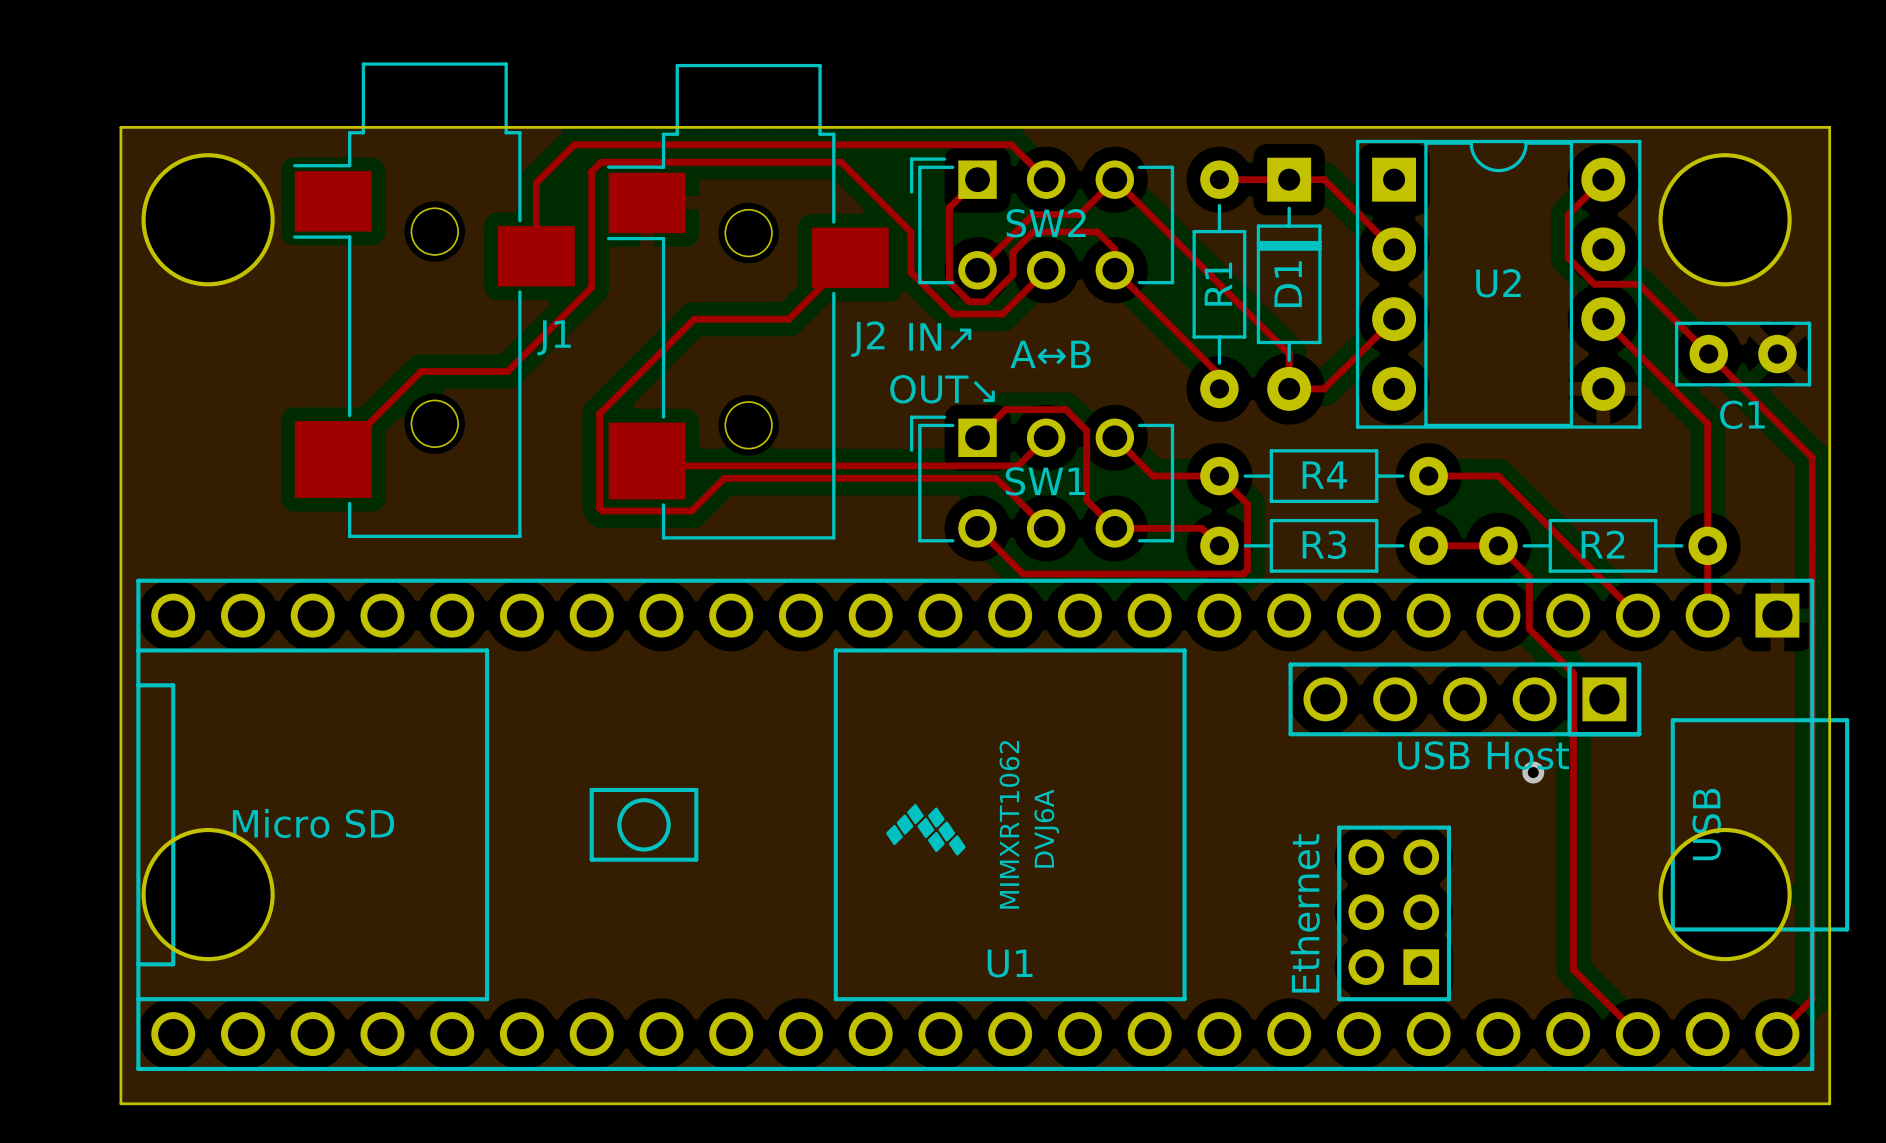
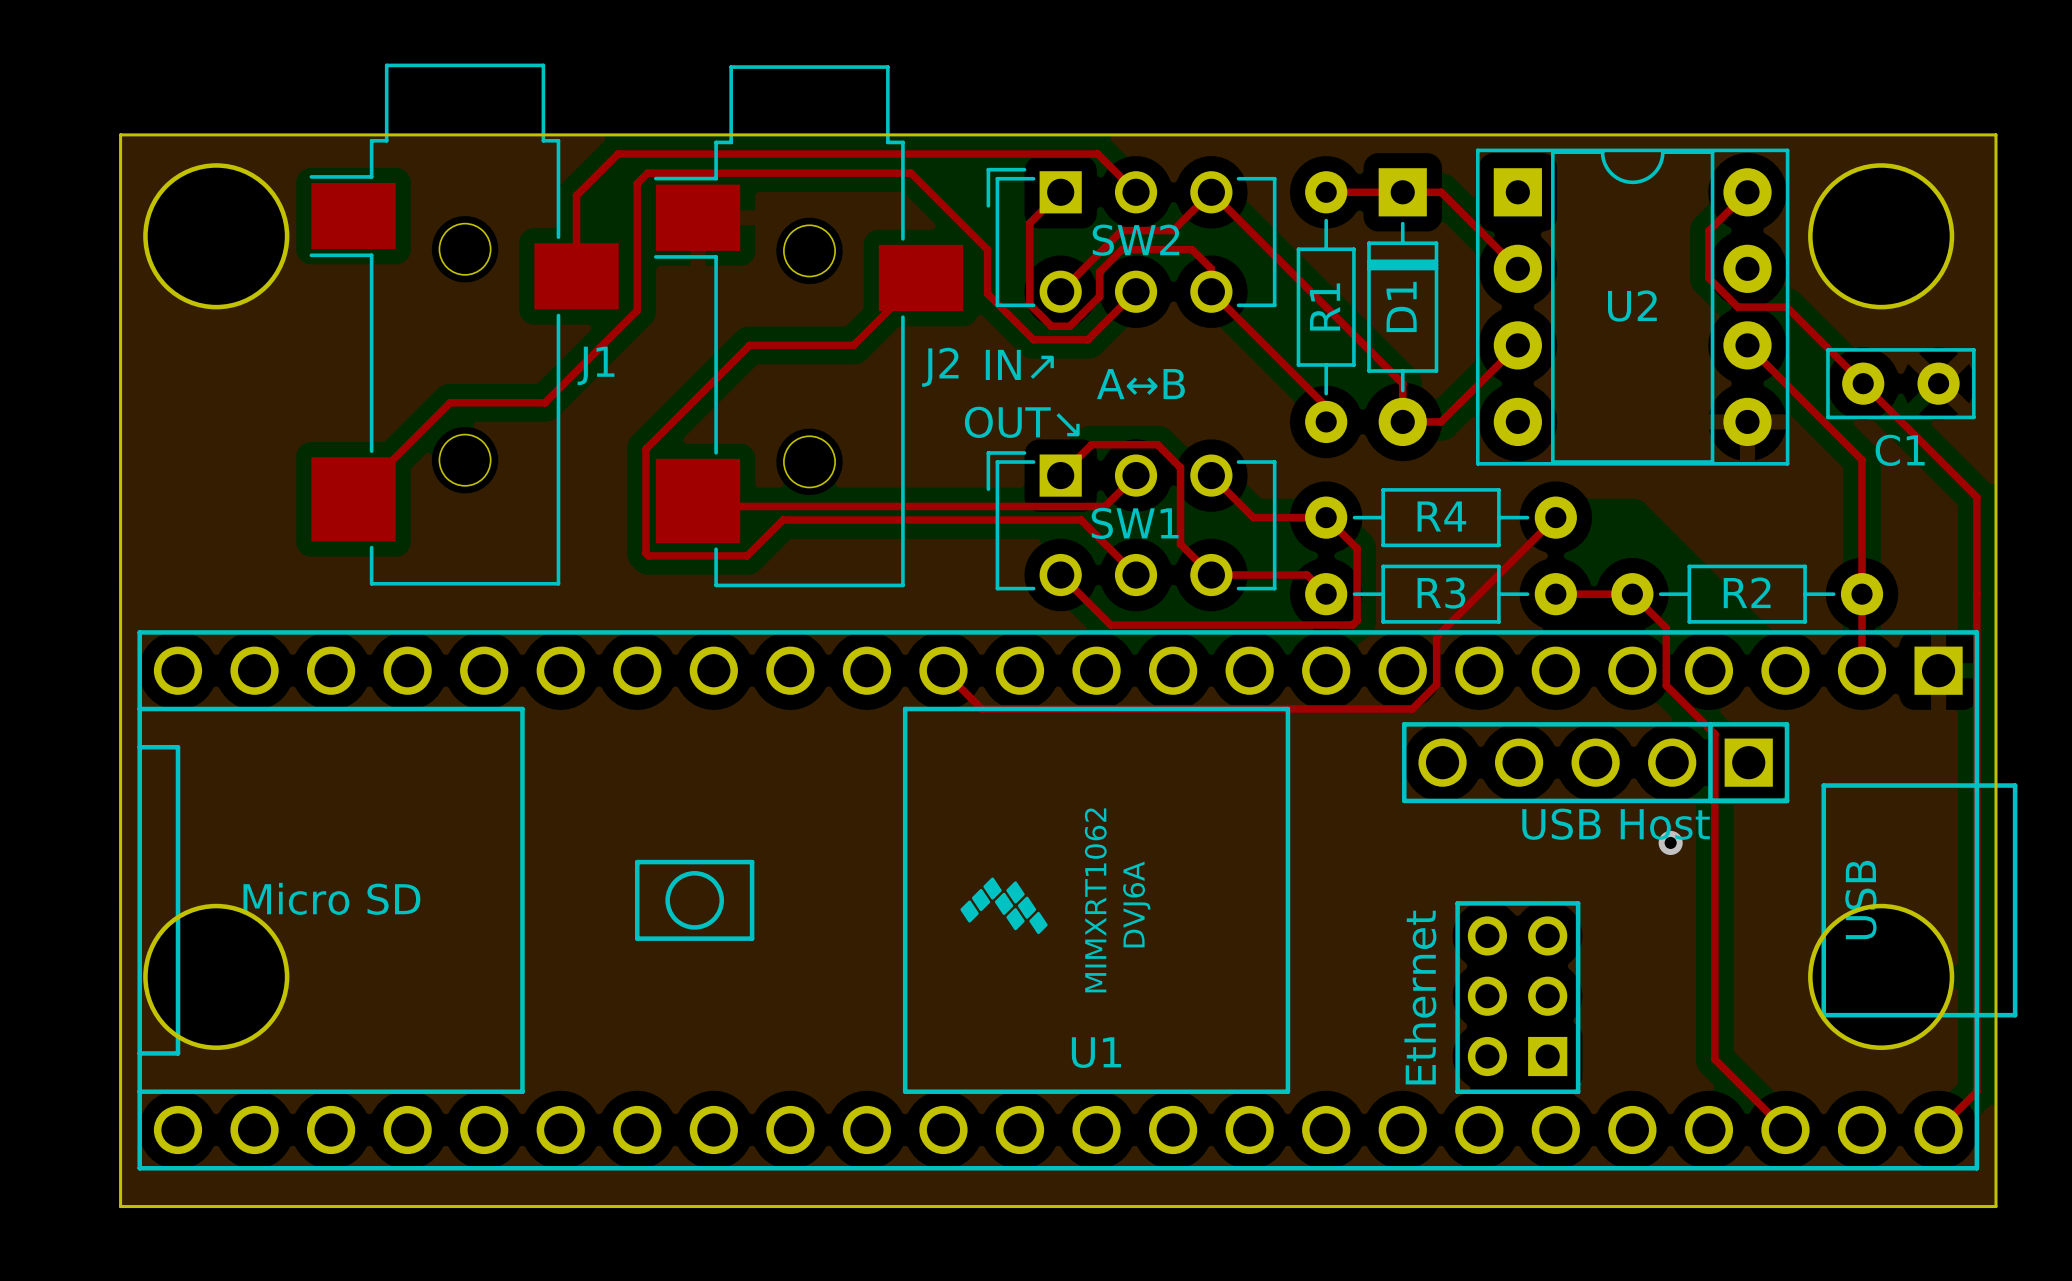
top track: (1428, 476) (1498, 476) (1637, 615) -> (1555, 517) (1436, 636) (1436, 684) (1412, 708) (981, 708) (943, 670)

